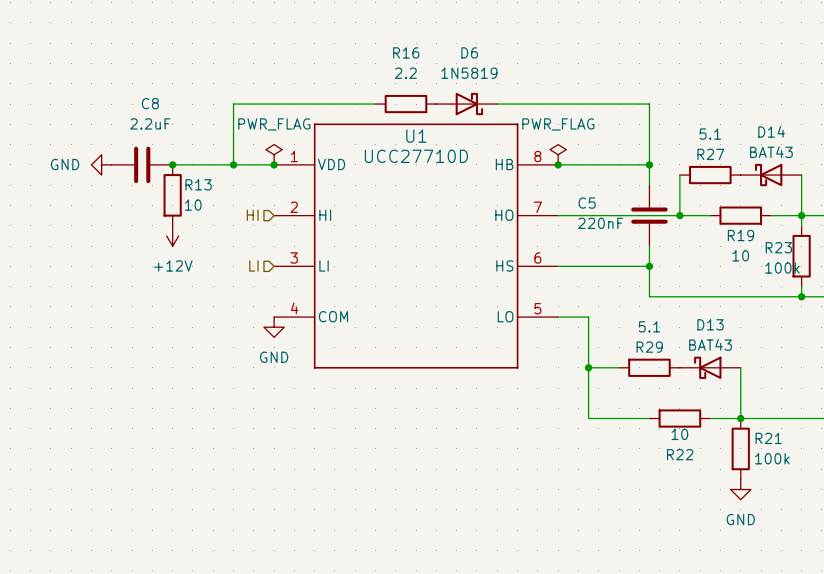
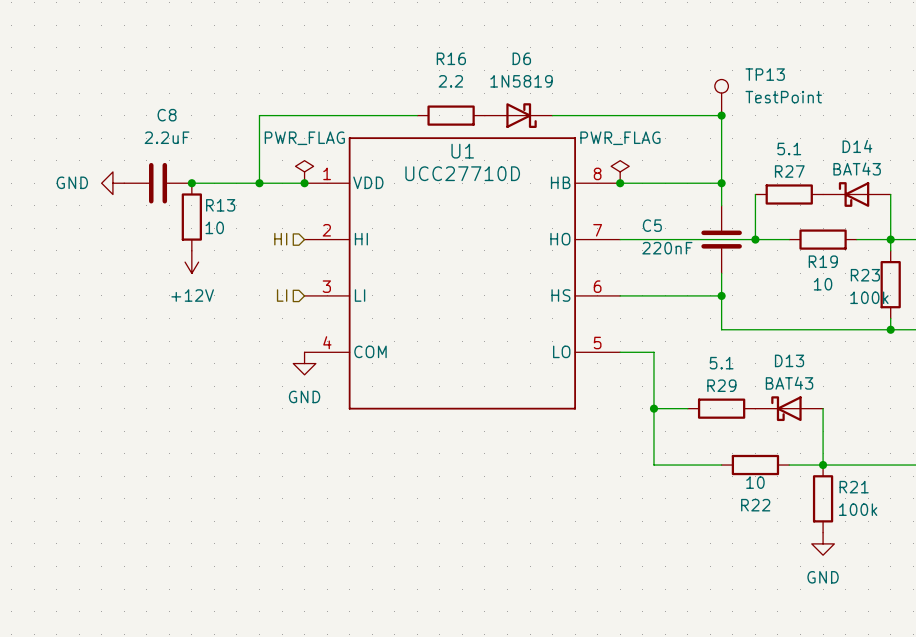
TP13: none -> TestPoint (721, 97)
junction: none -> (721, 115)

